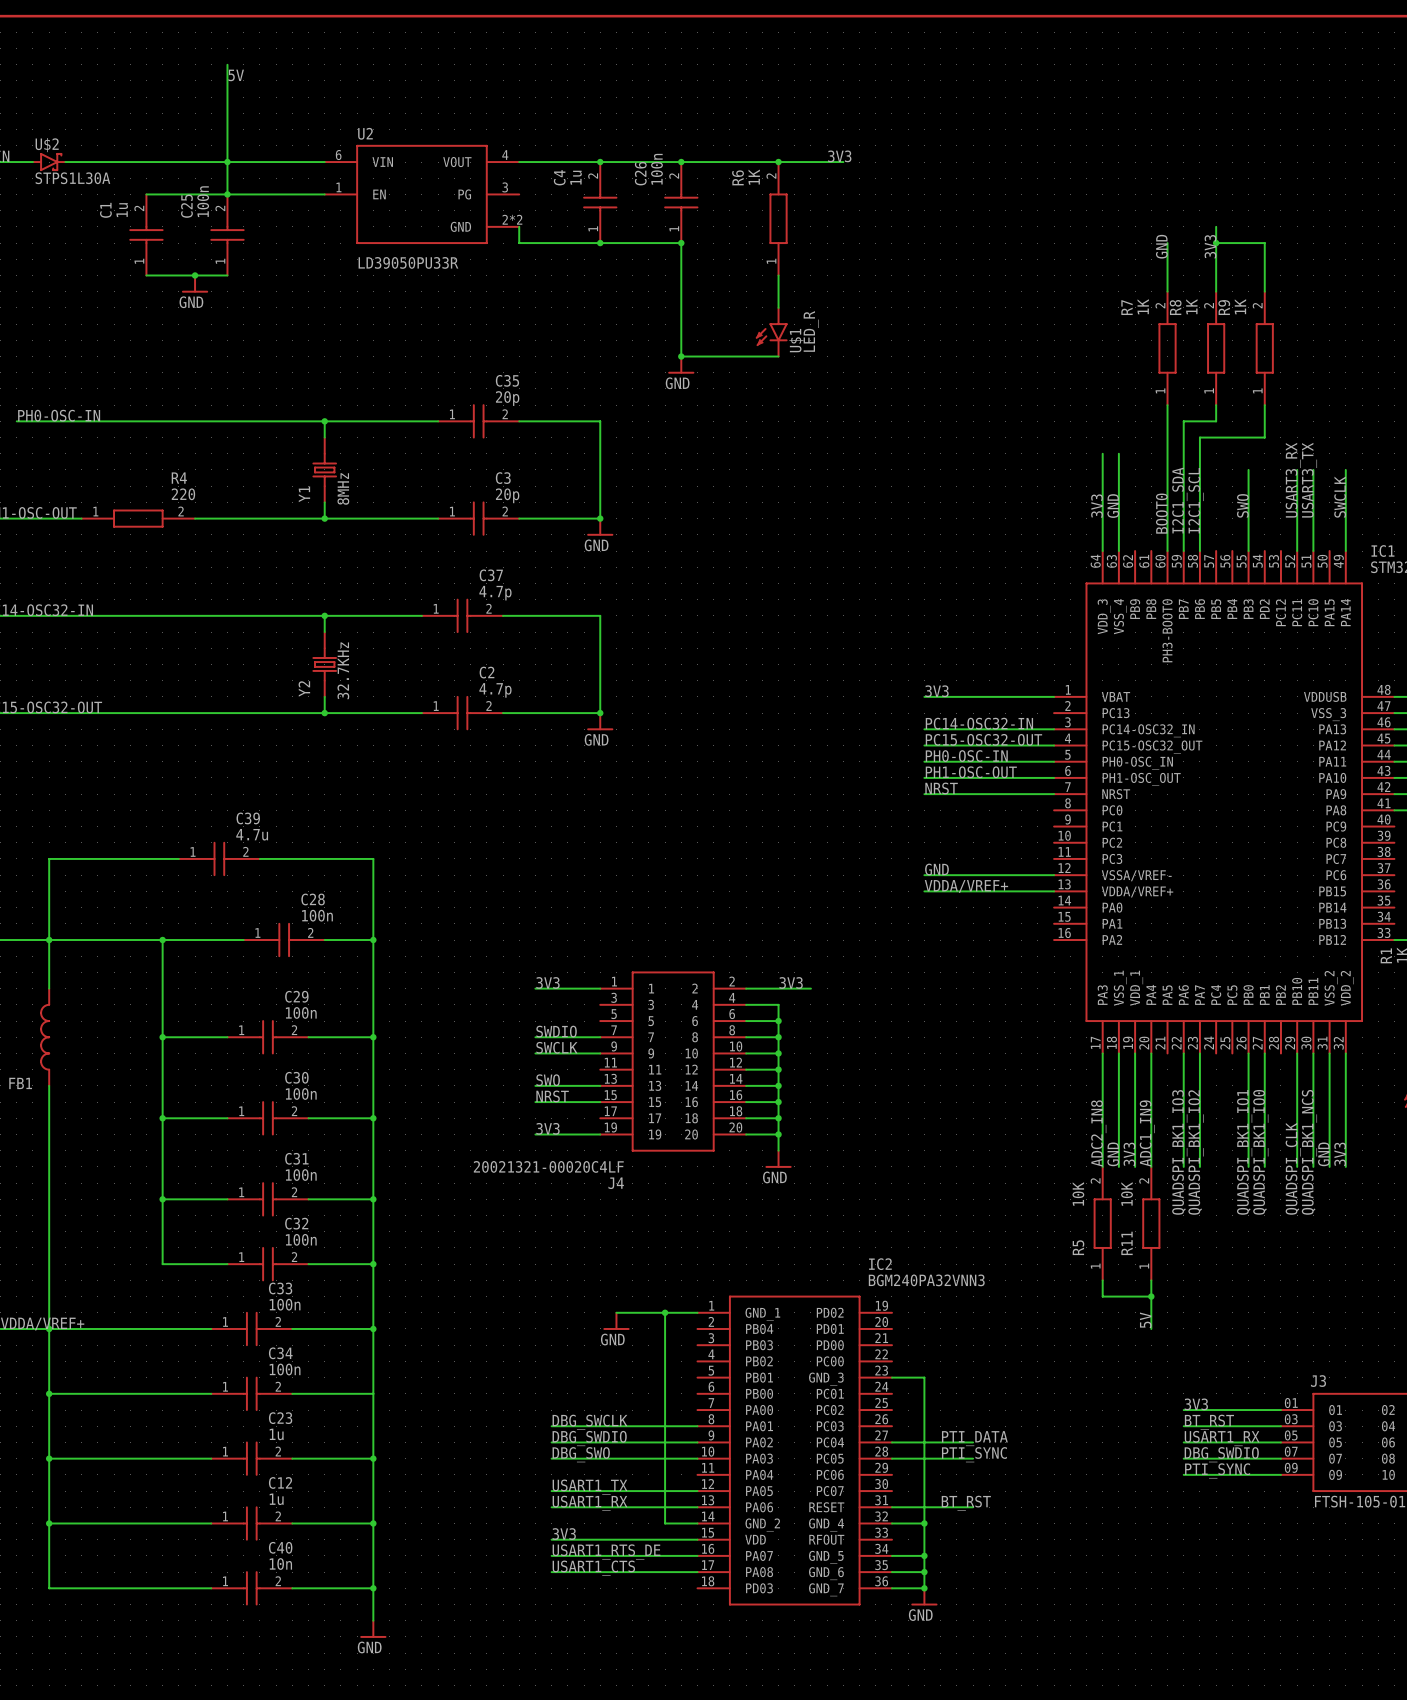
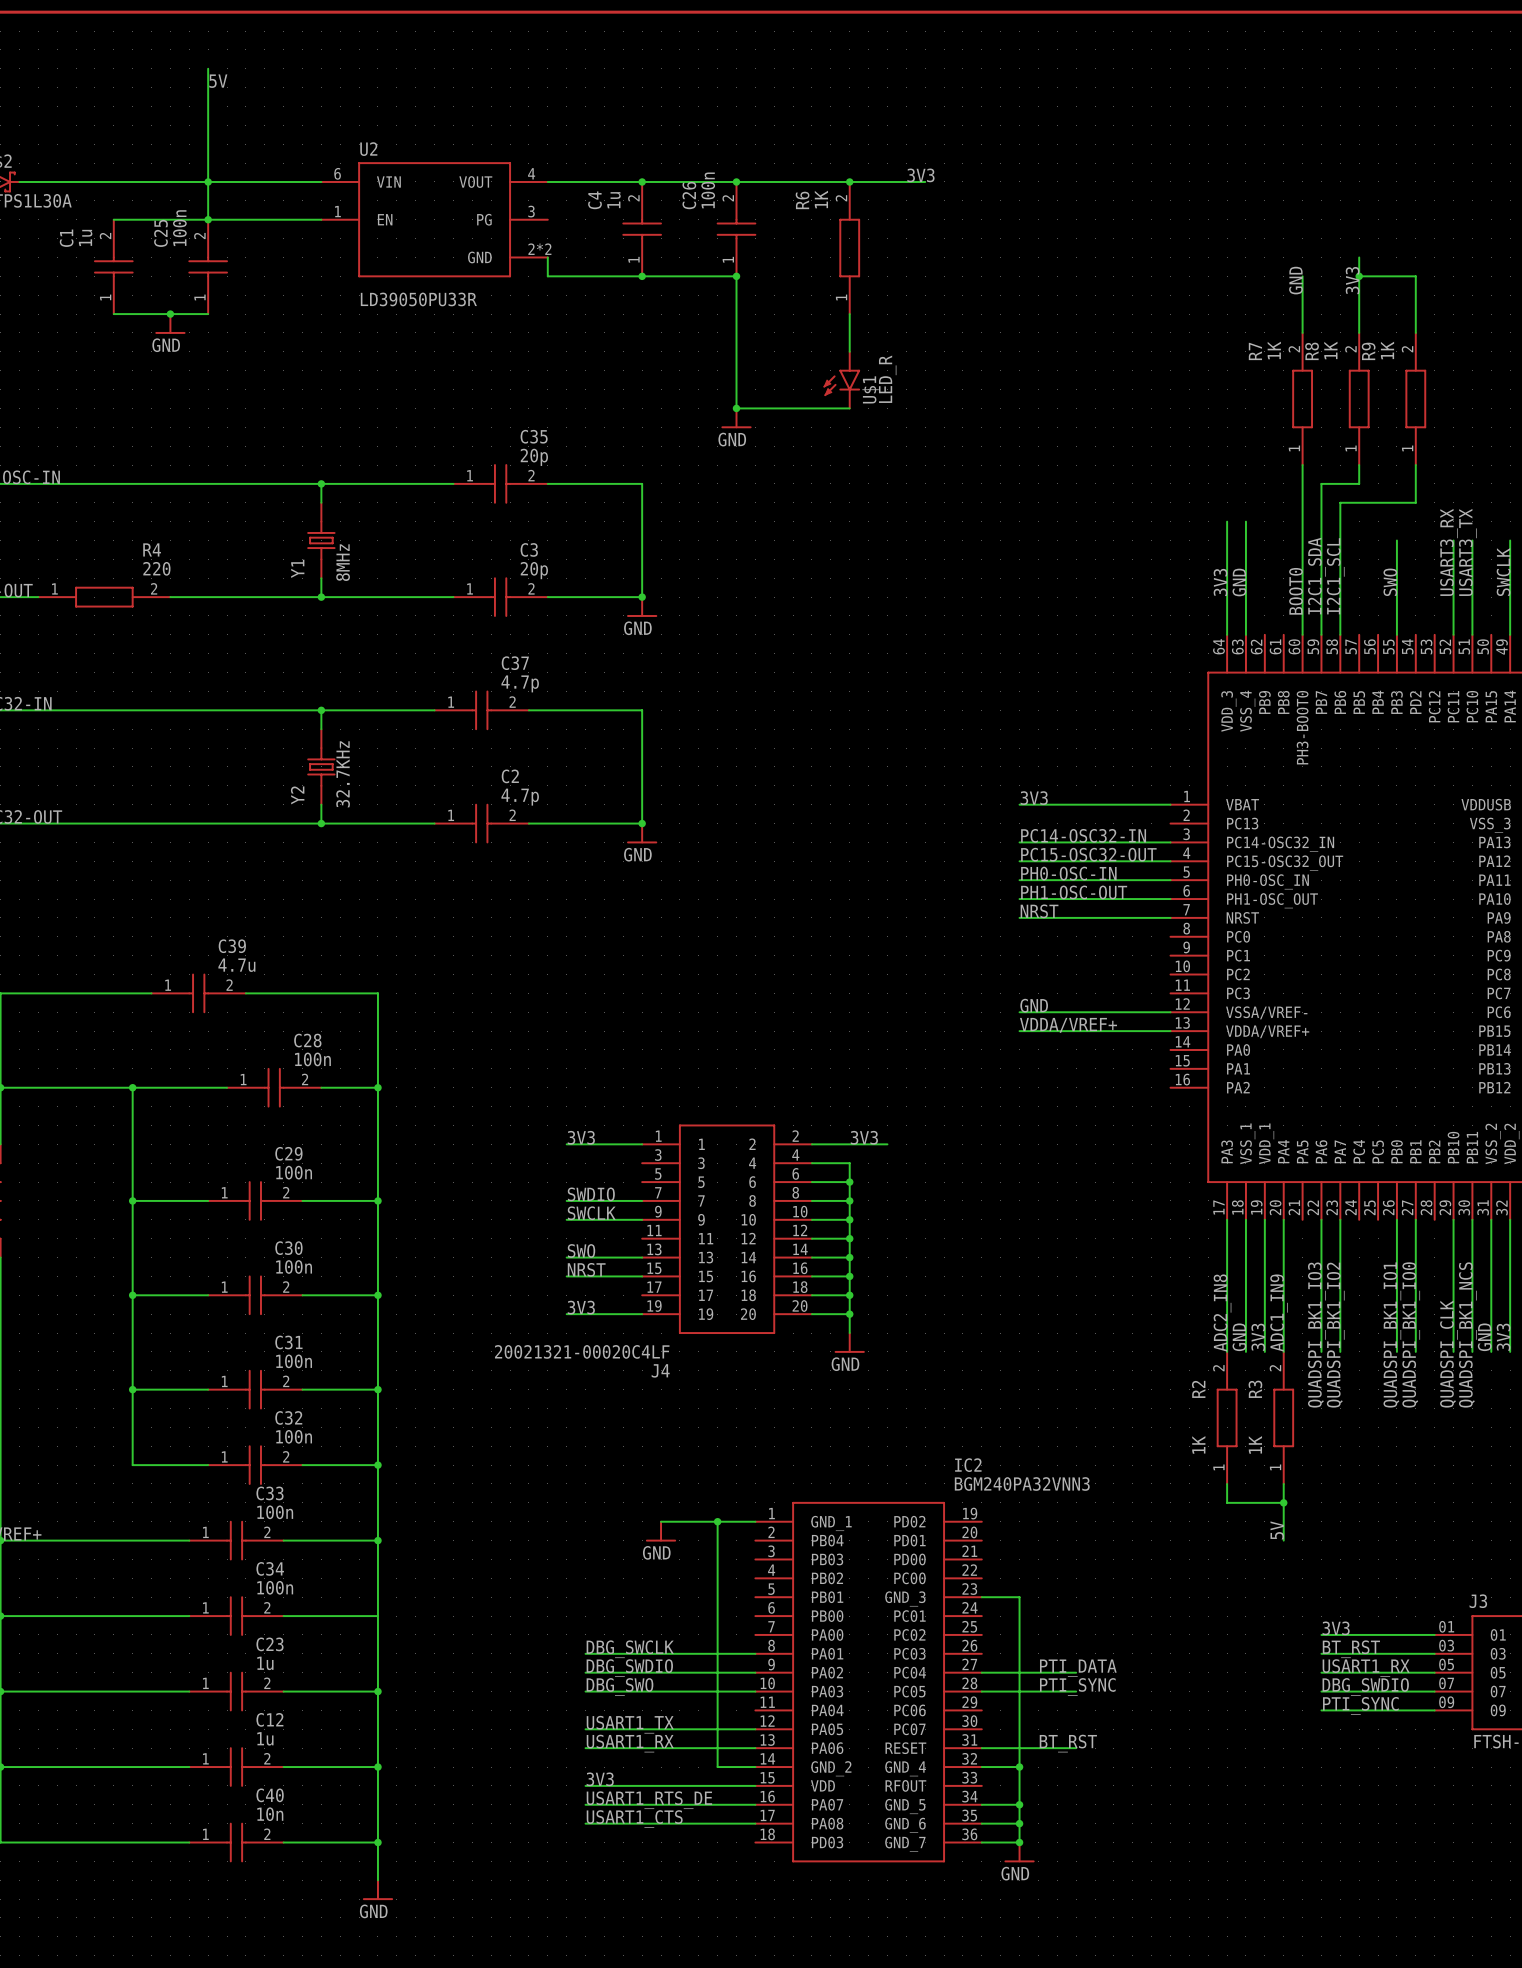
R5 value: 10K (1078, 1193) -> 1K (1198, 1444)
R11 value: 10K (1127, 1193) -> 1K (1255, 1444)
R11 name: R11 (1127, 1243) -> R3 (1255, 1389)
R5 name: R5 (1078, 1247) -> R2 (1198, 1389)

